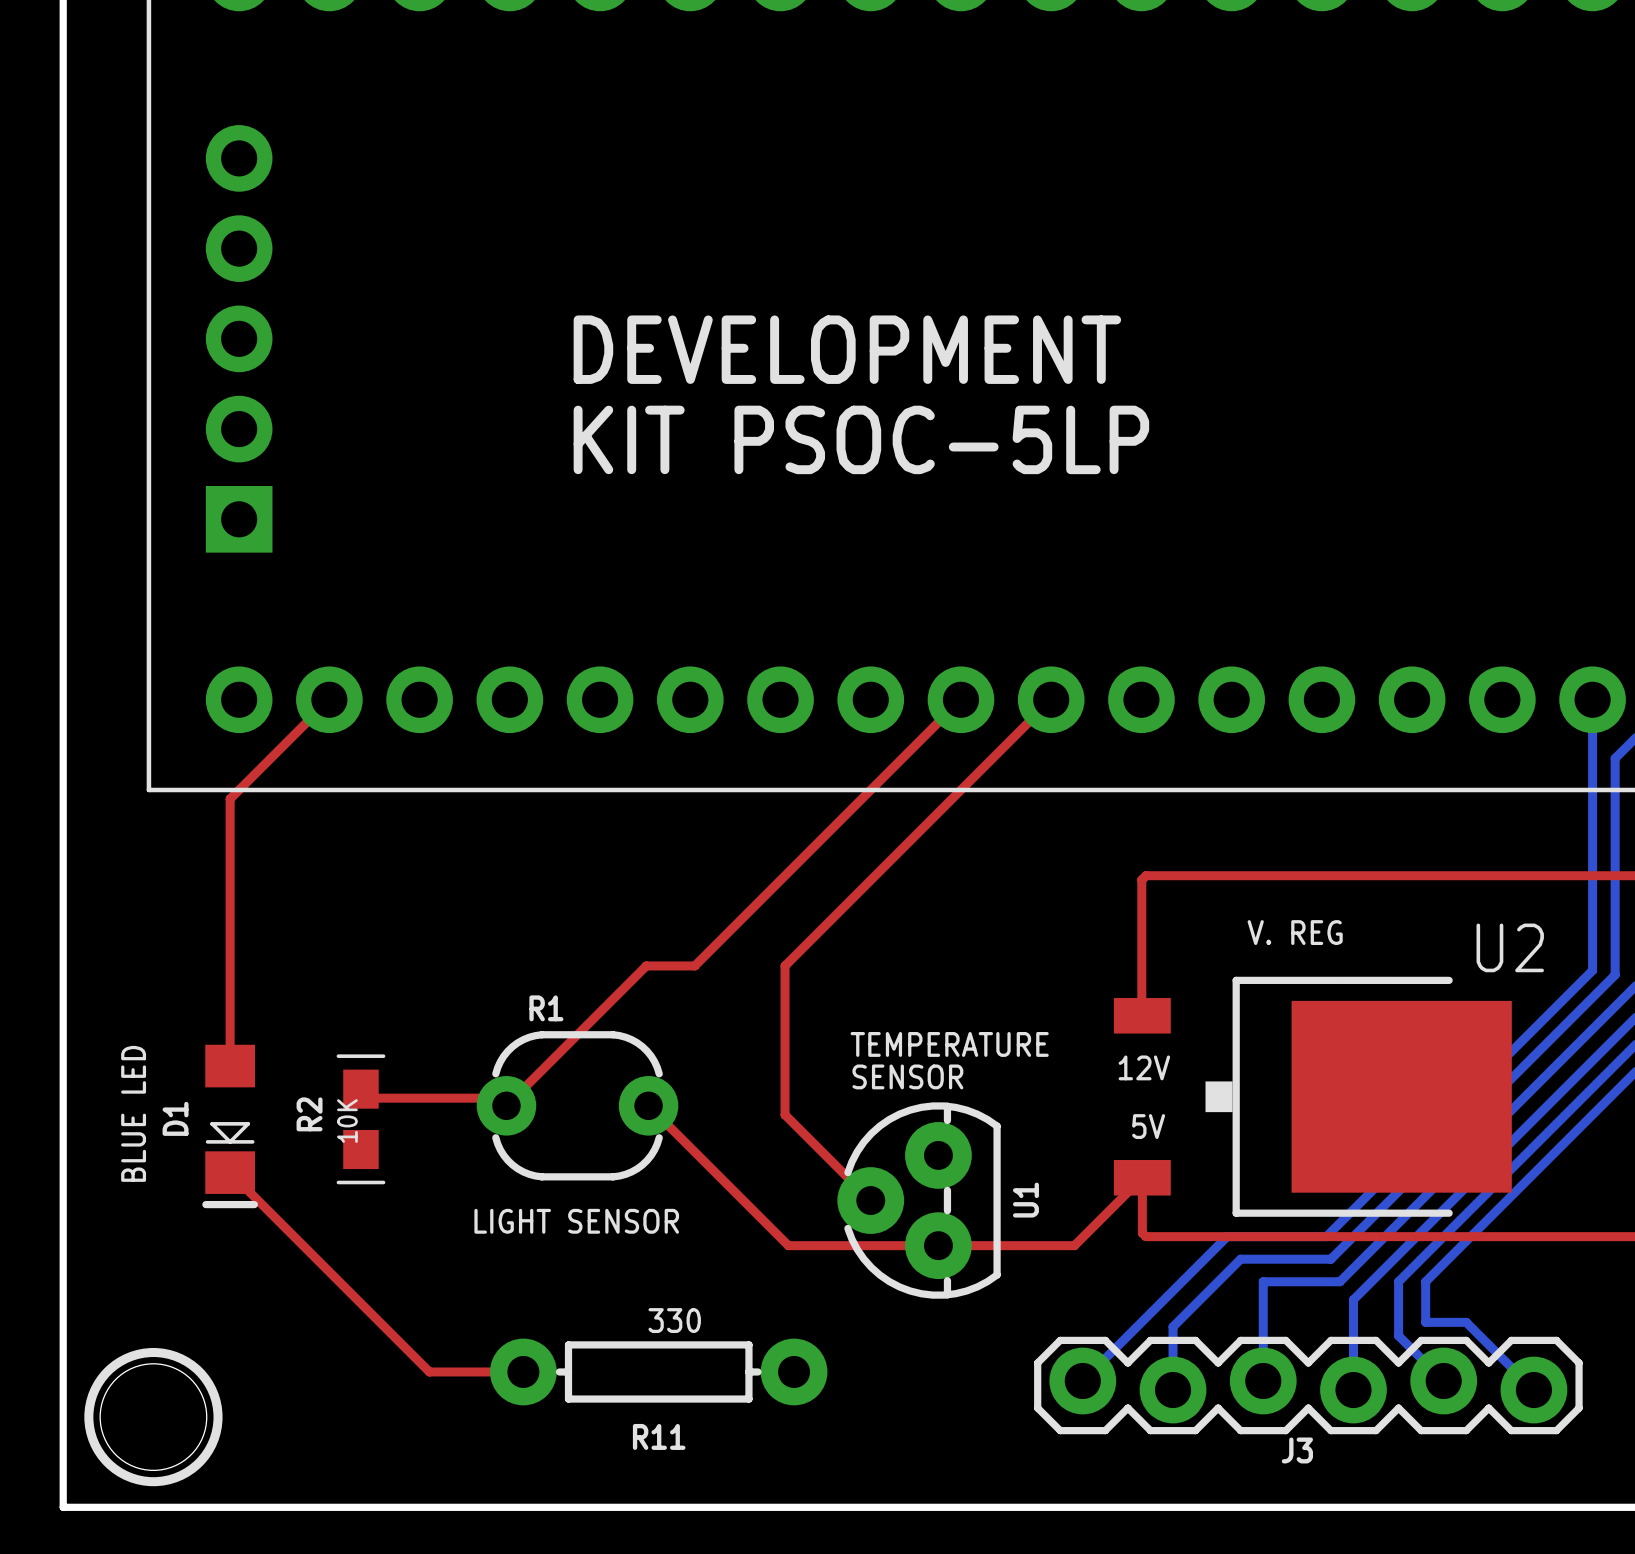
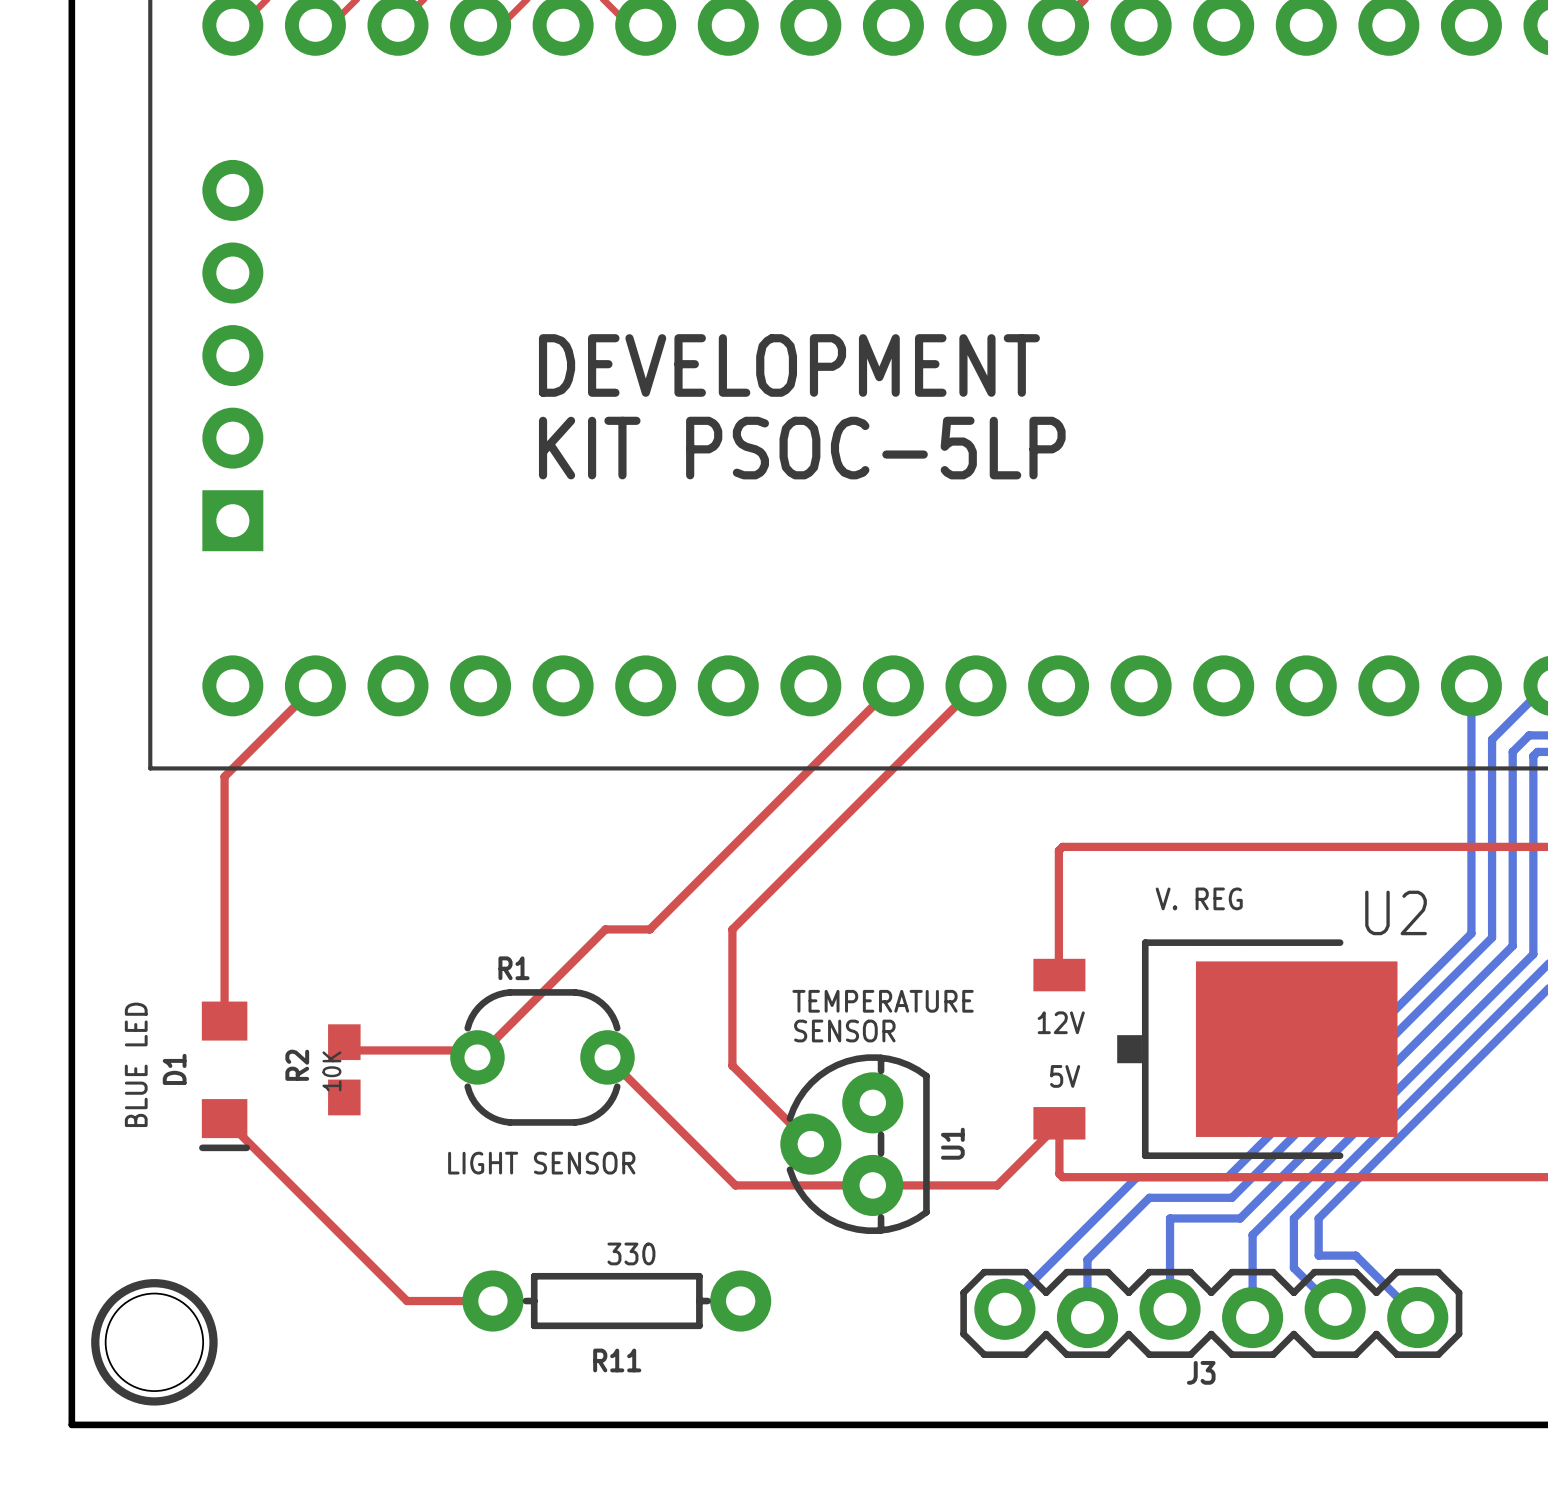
line: (338, 1056) (383, 1056) -> none
line: (212, 1123) (230, 1141) (248, 1123) (212, 1123) -> none
line: (207, 1141) (252, 1141) -> none
line: (338, 1182) (383, 1182) -> none

